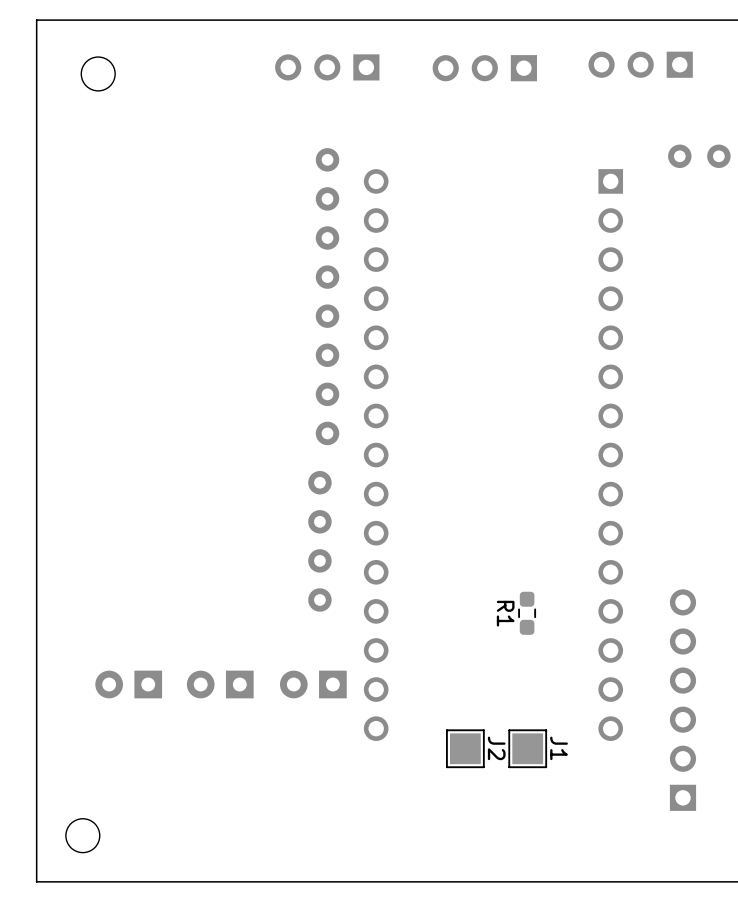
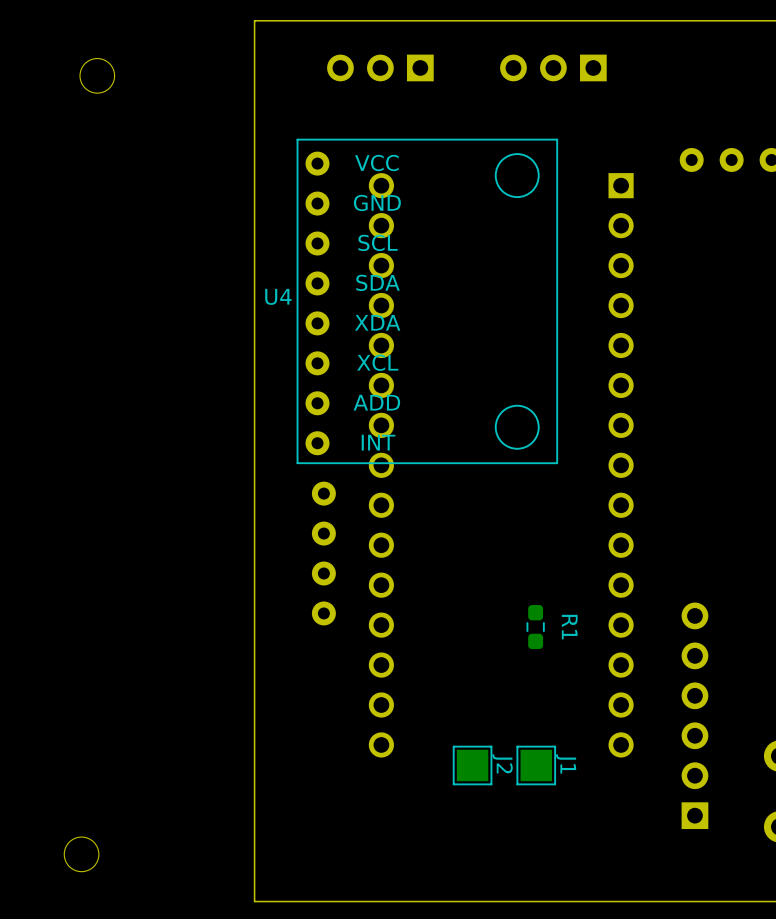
board edge: (252, 20) (36, 20) (36, 881) (252, 881) -> (254, 20) (254, 901)
part: (640, 64) -> none
part: none -> (553, 67)
part position: (327, 67) -> (380, 67)
part: (484, 68) -> none
U4 side: top (327, 296) -> bottom (427, 301)
R1 name position: R1 (505, 613) -> R1 (569, 627)
part: (128, 684) -> none
part: (220, 684) -> none
part: (313, 684) -> none

